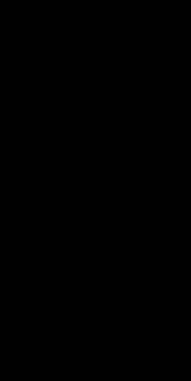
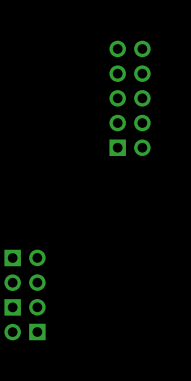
part: none -> (130, 98)
part: none -> (12, 270)
part: none -> (37, 294)
part: none -> (12, 319)

